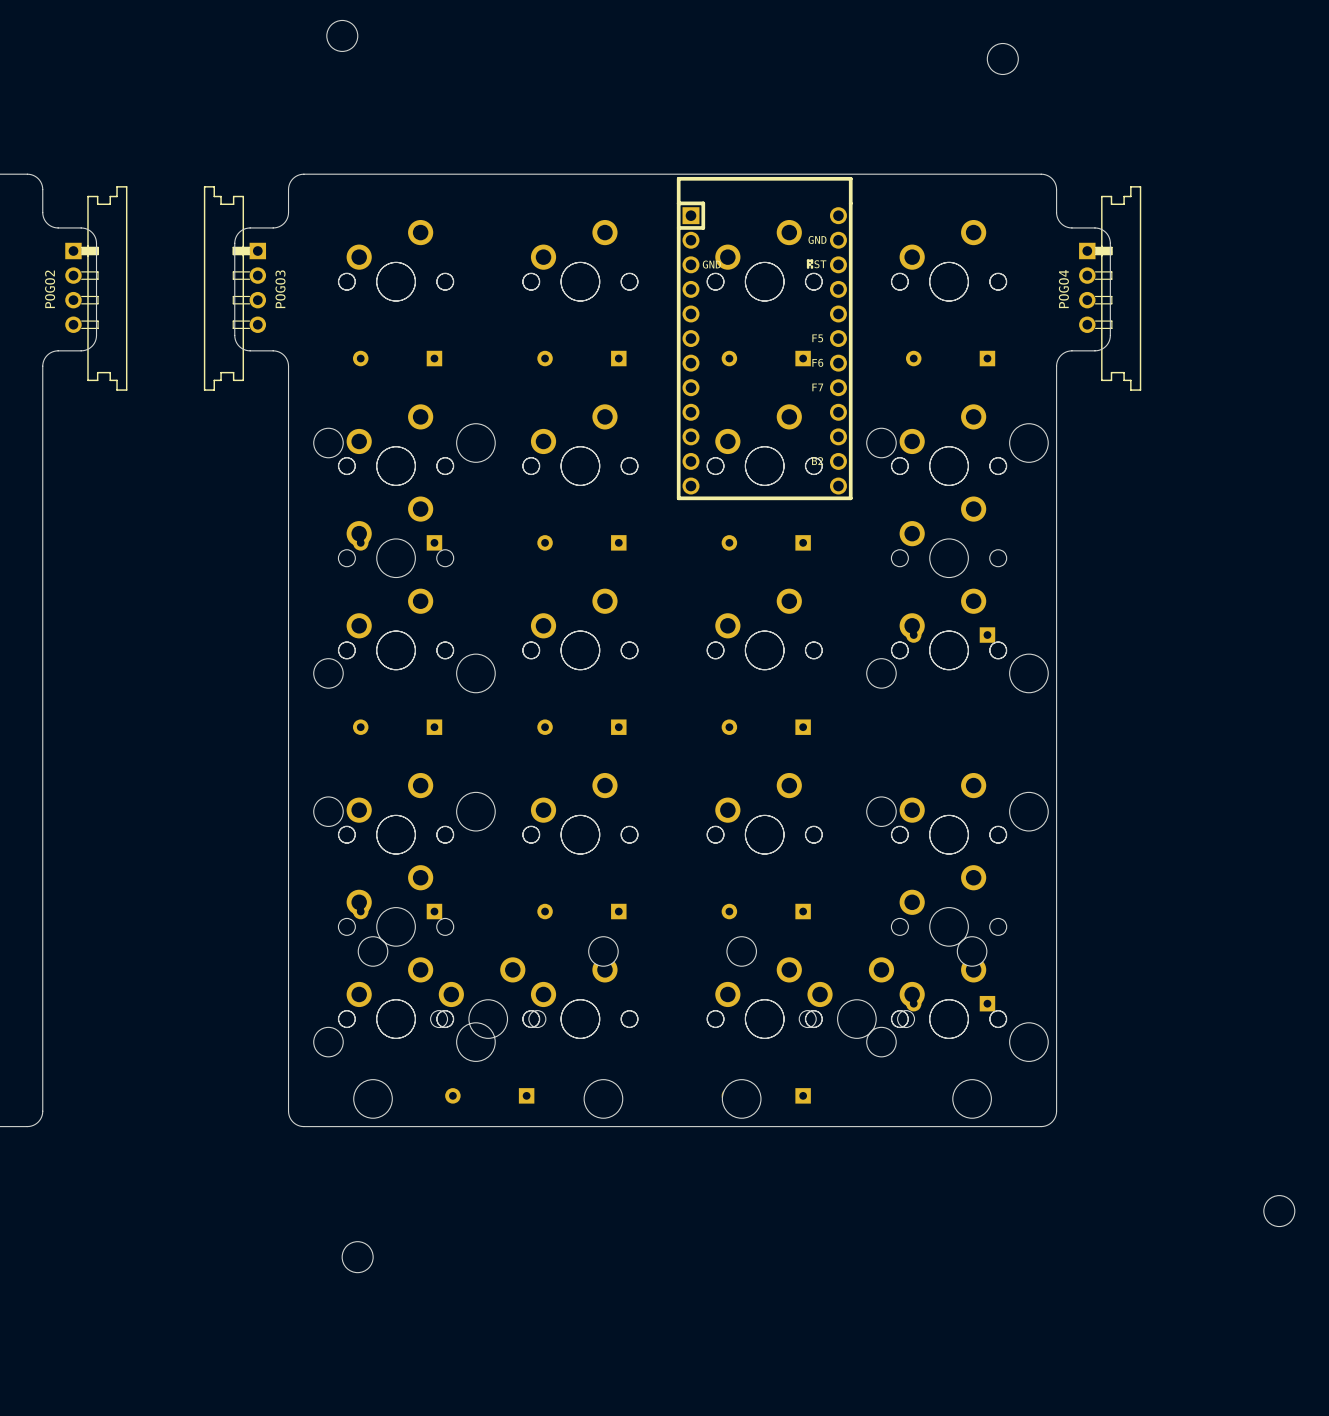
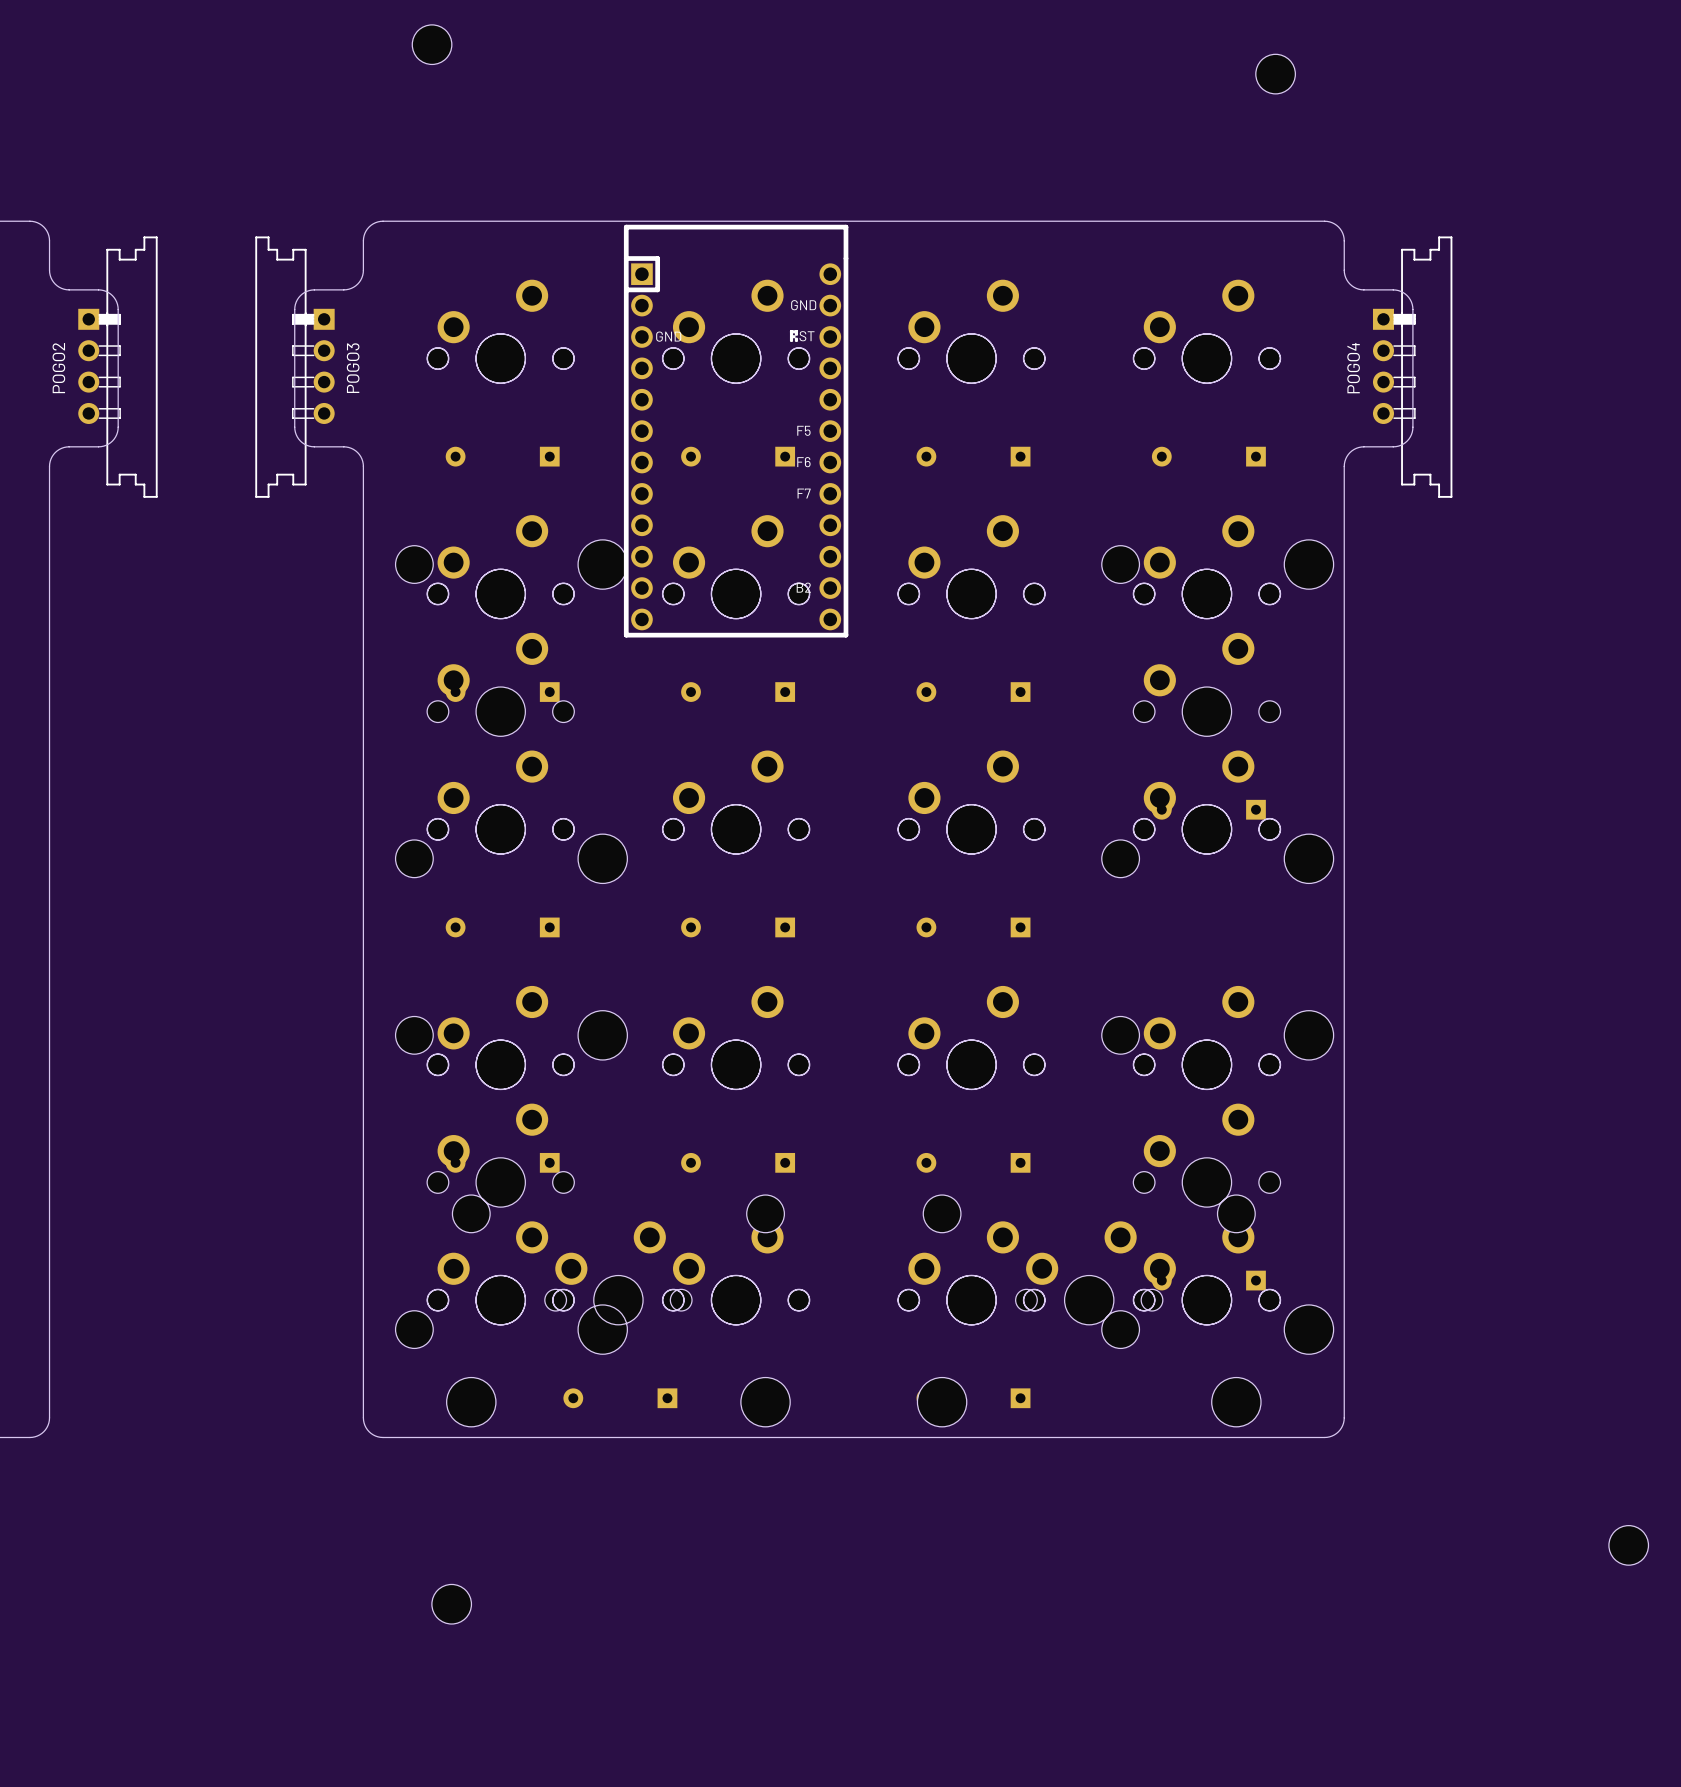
part position: (764, 338) -> (736, 431)

